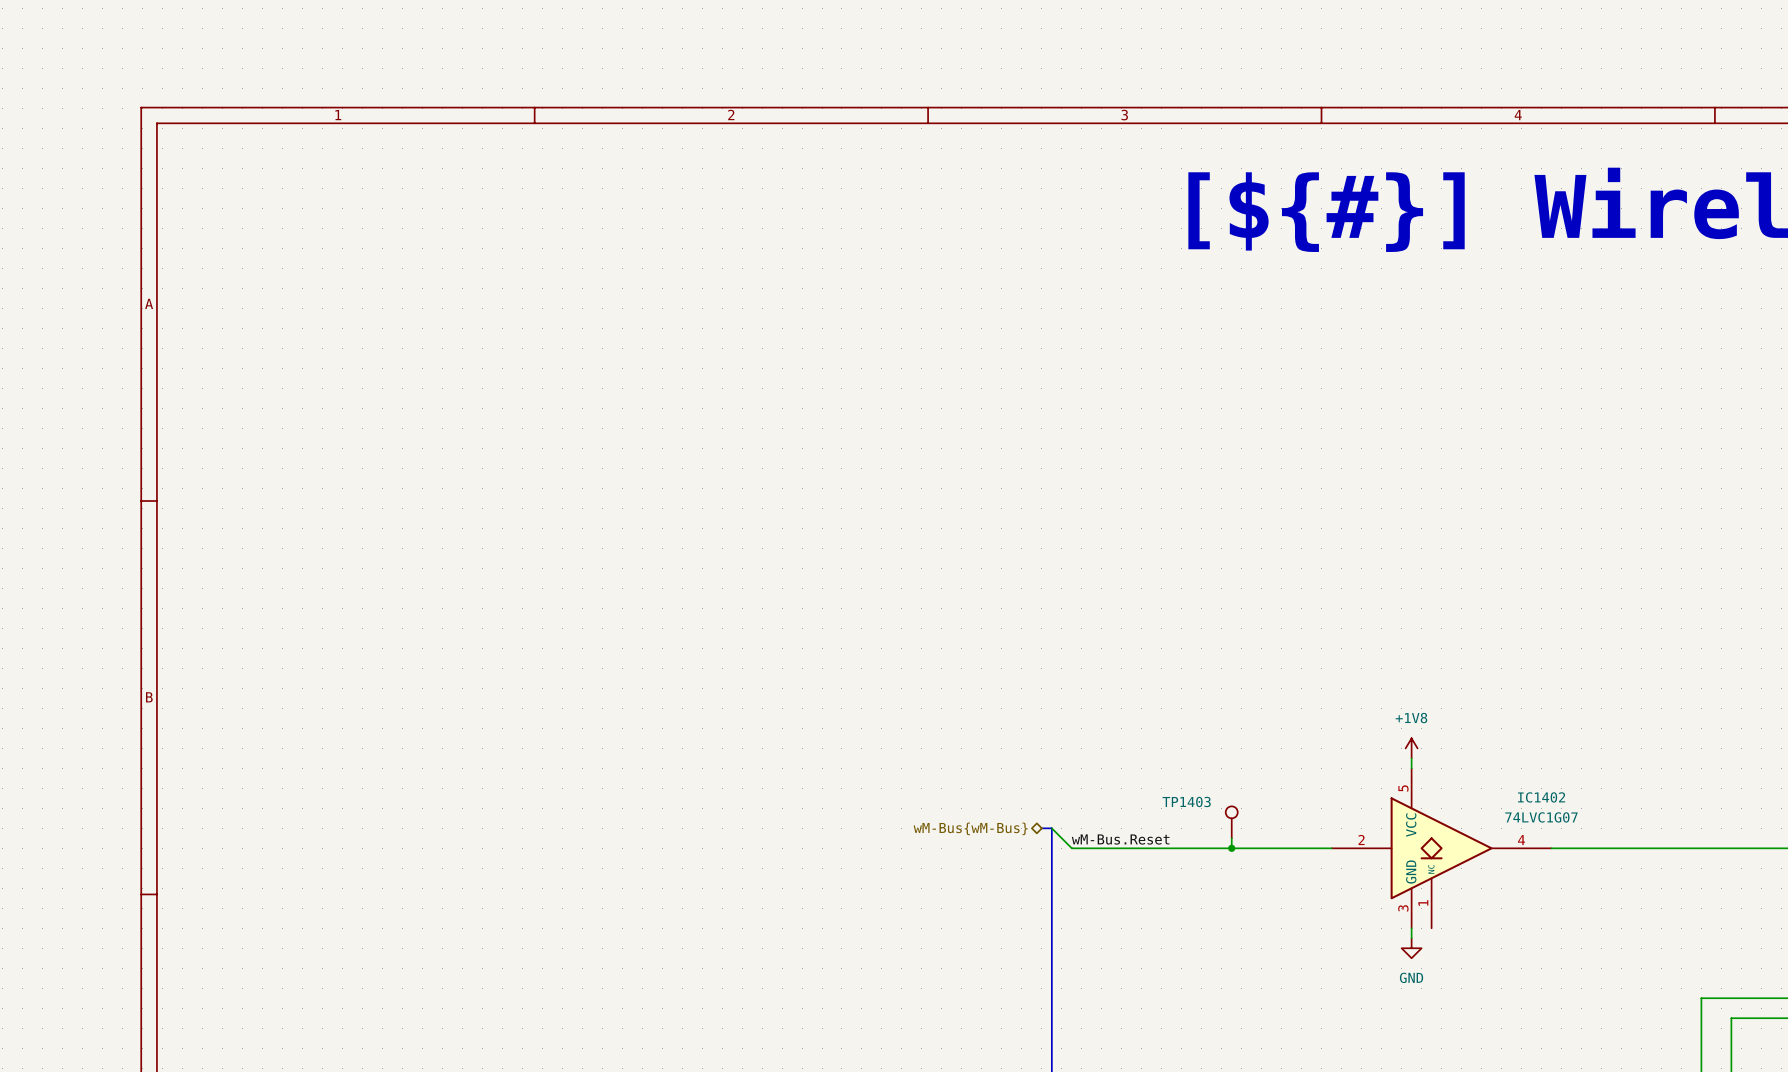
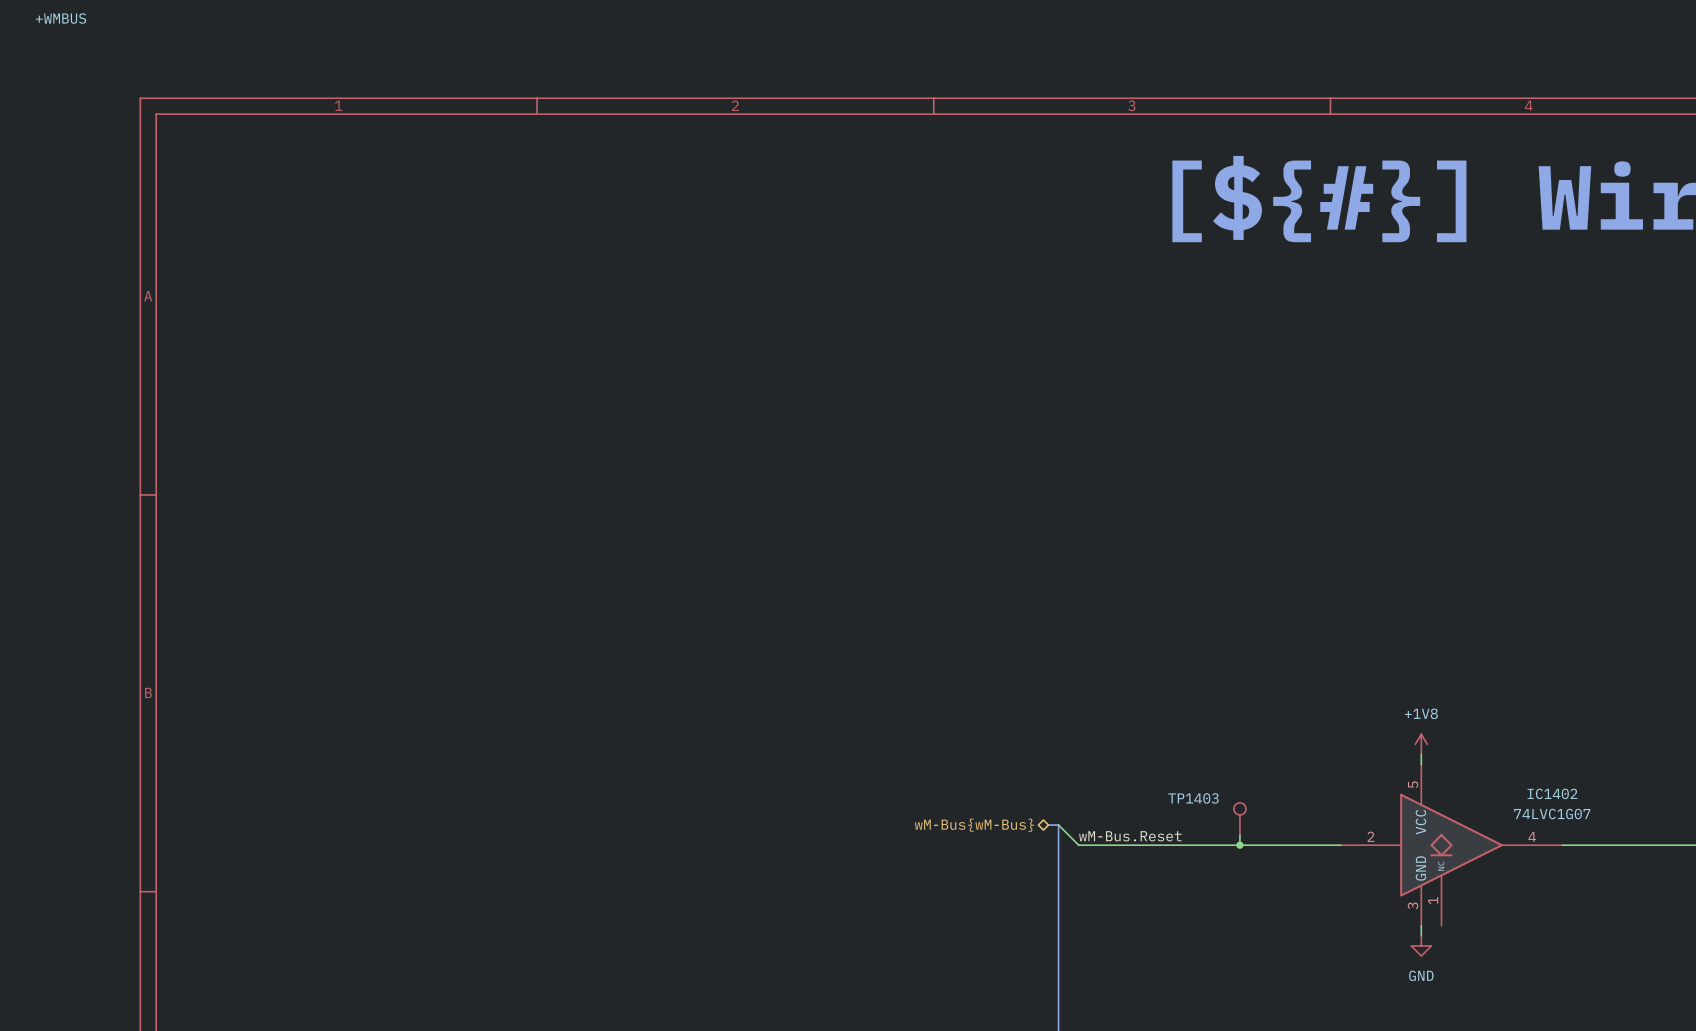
IC1402 text: none -> +WMBUS (61, 18)

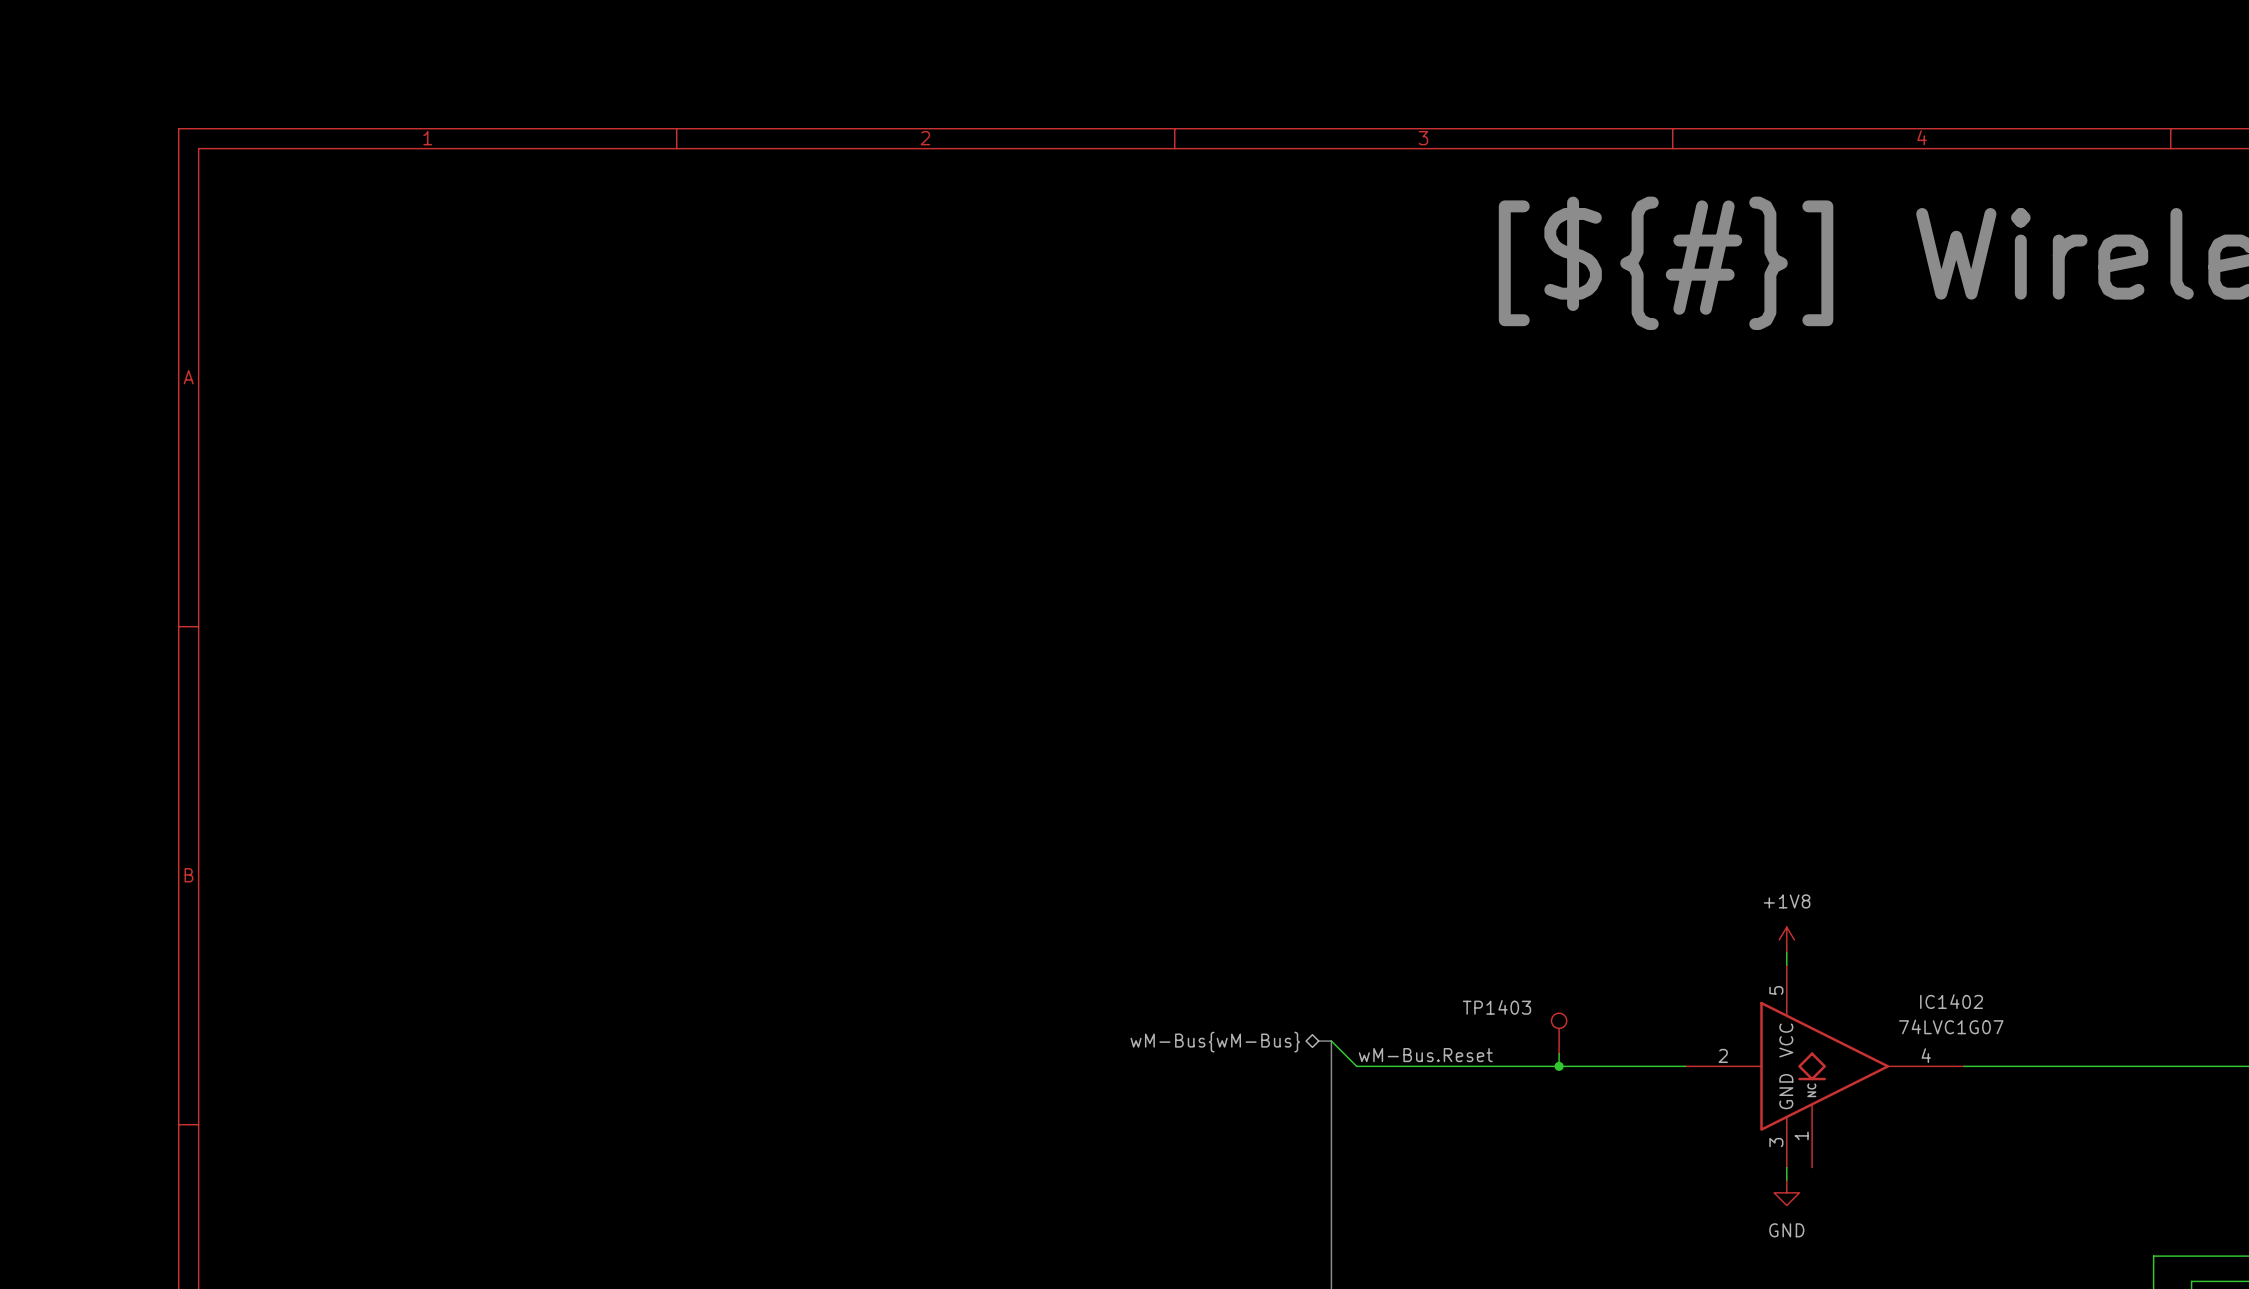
IC1402 text: +WMBUS (61, 18) -> none

